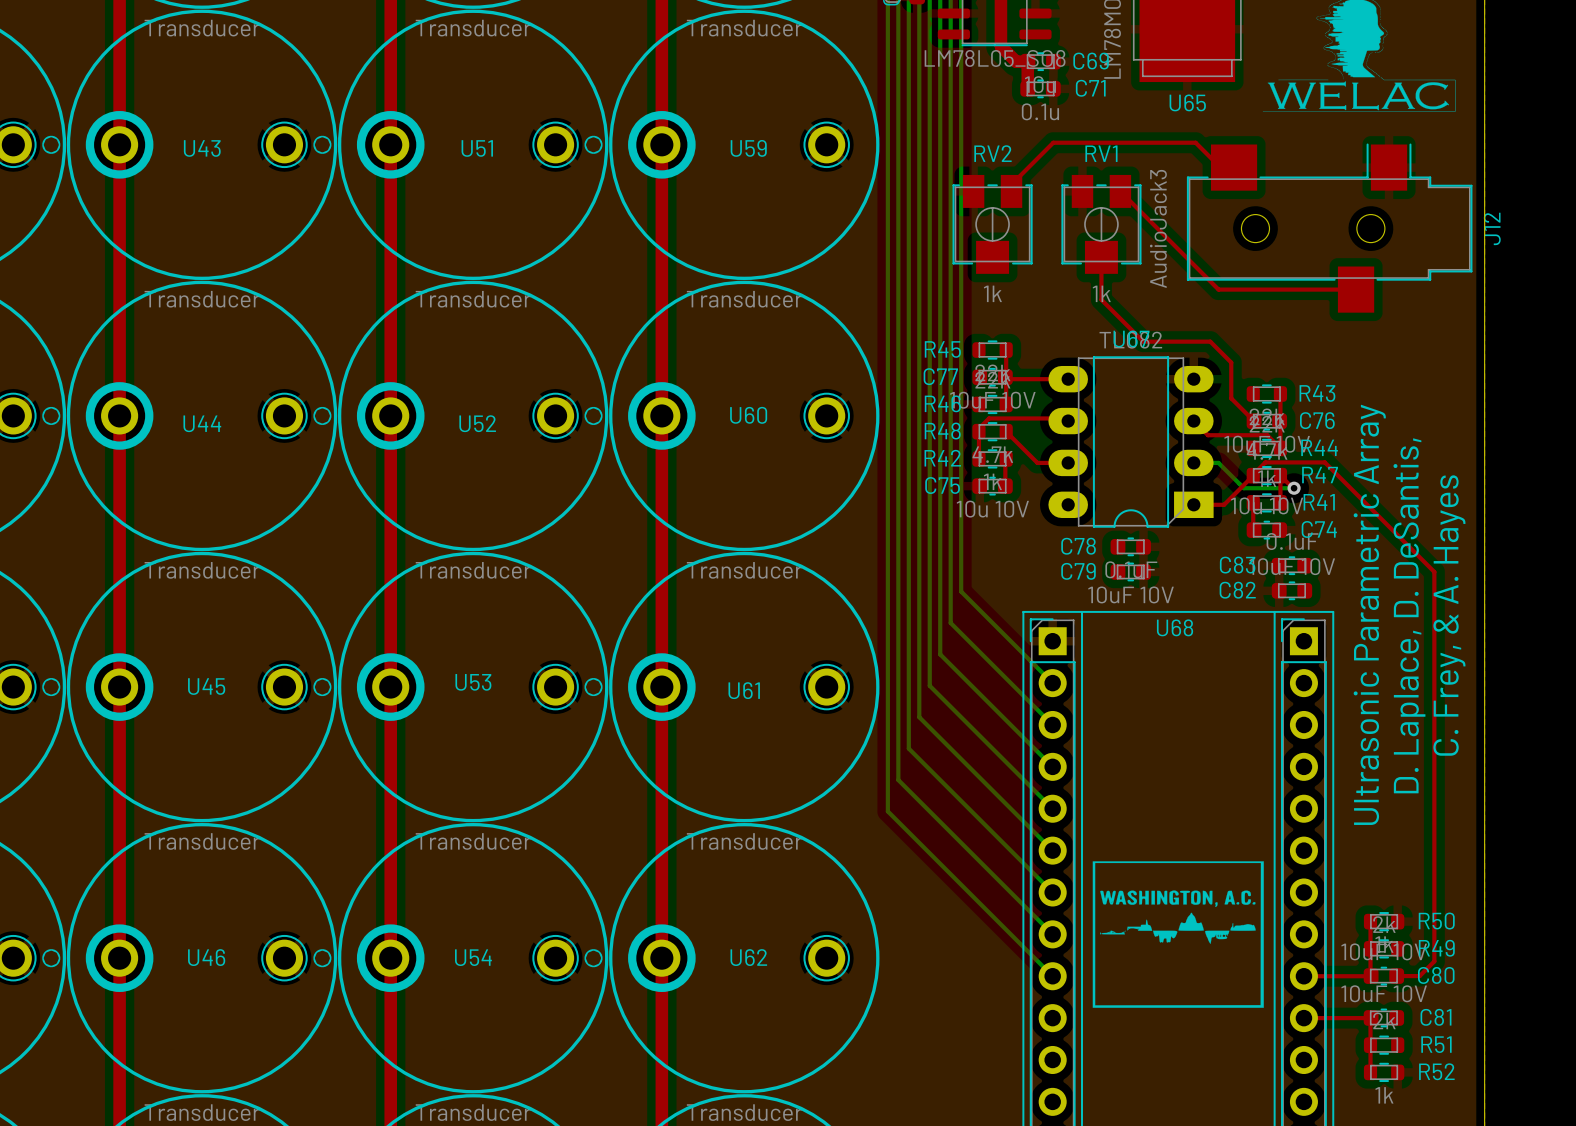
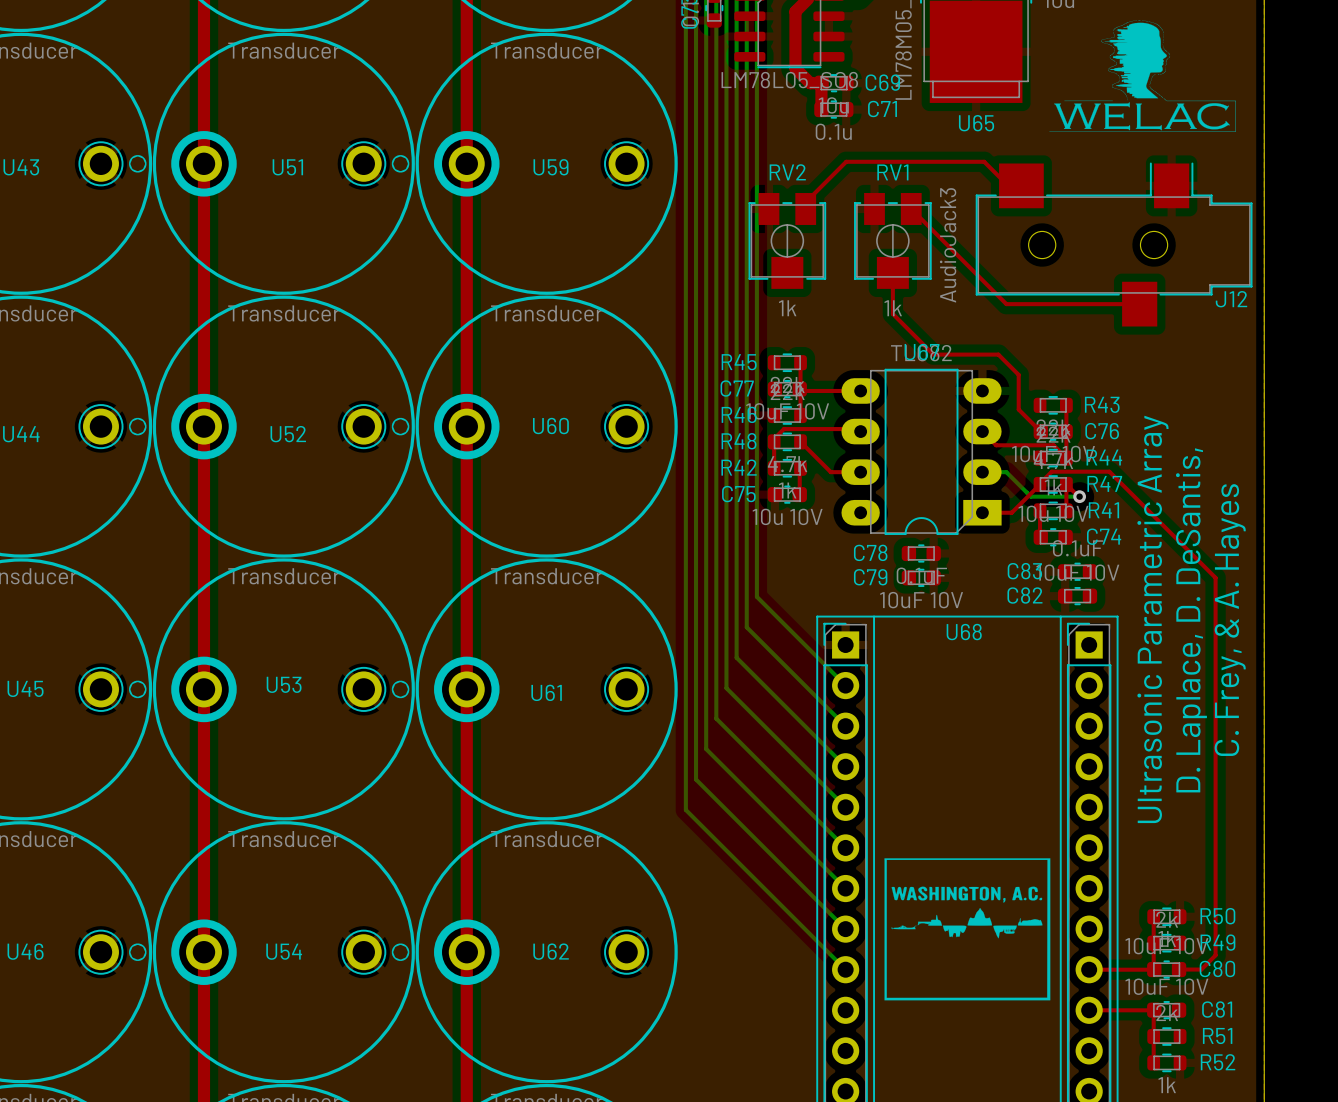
J12 name rotation: 0° (1492, 228) -> 90° clockwise (1231, 299)
J12 name position: J12 (1492, 228) -> J12 (1231, 299)

